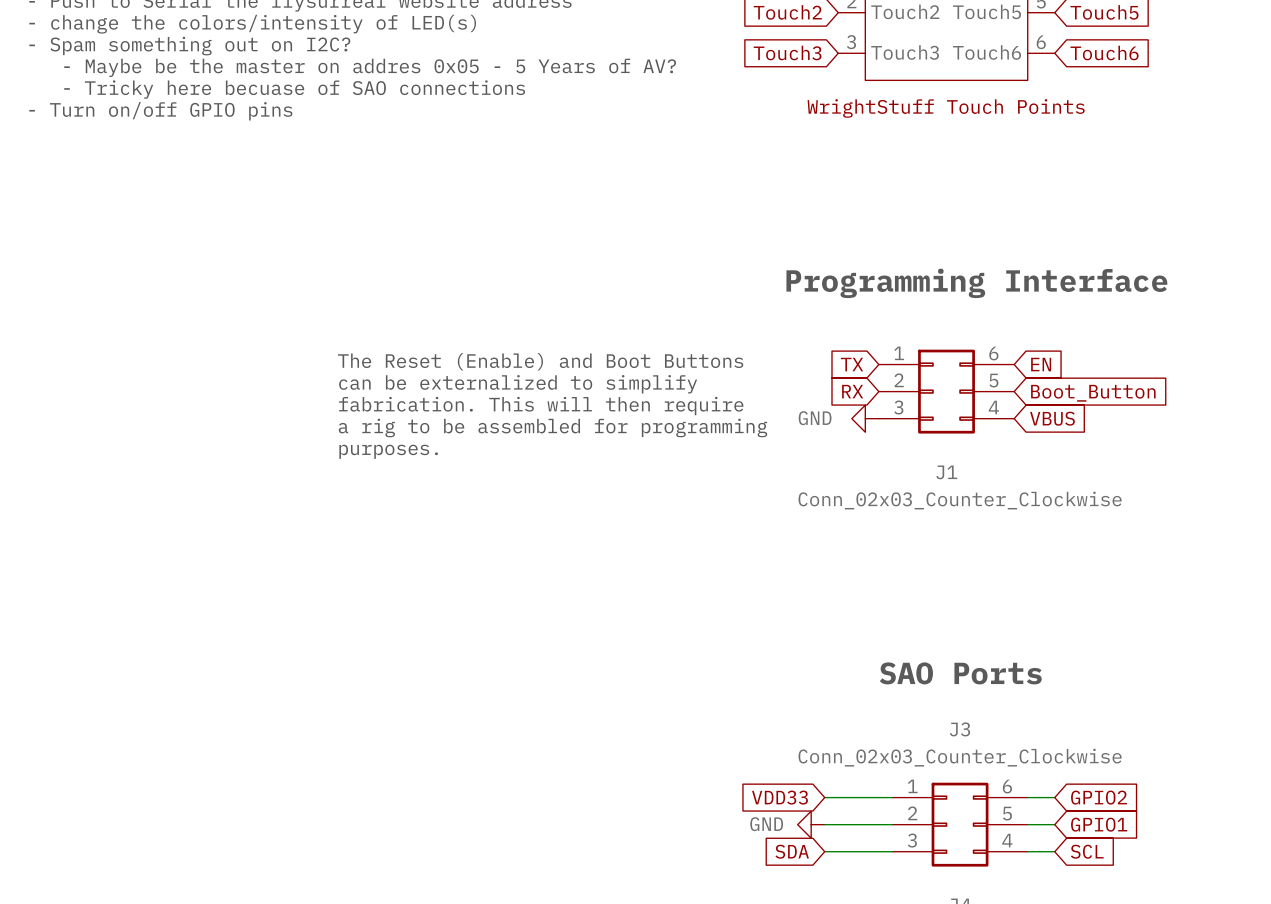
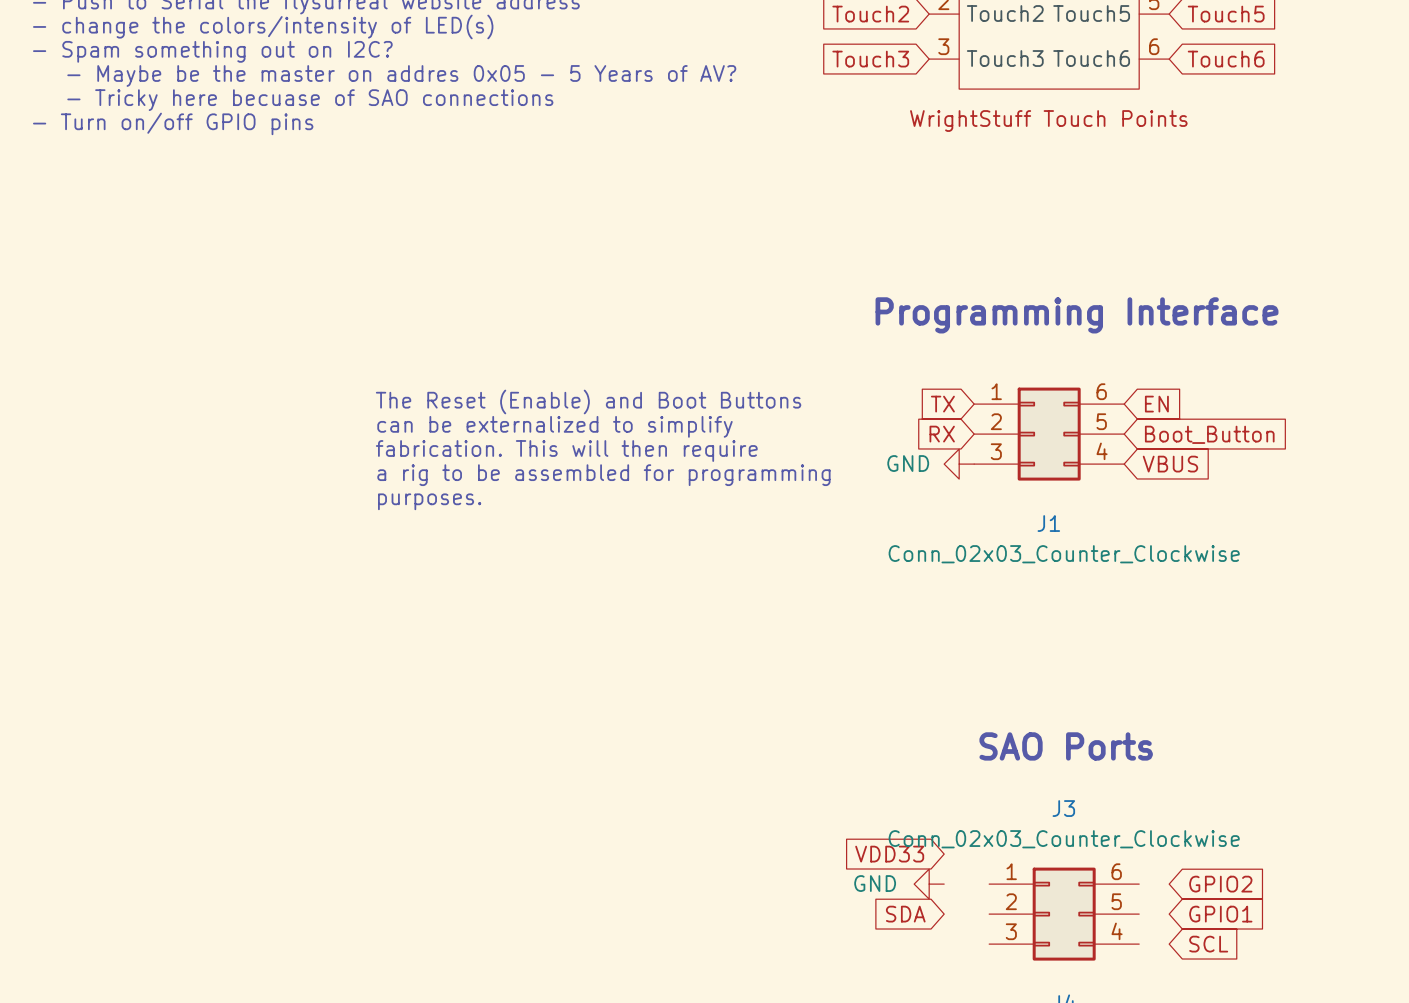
global label position: VDD33 (779, 797) -> VDD33 (889, 854)
wire: (824, 797) (892, 797) -> none
wire: (1027, 797) (1054, 797) -> none
power symbol position: GND (811, 824) -> GND (929, 884)
wire: (824, 824) (892, 824) -> none
wire: (1027, 824) (1054, 824) -> none
global label position: SDA (792, 851) -> SDA (905, 914)
wire: (824, 851) (892, 851) -> none
wire: (1027, 851) (1054, 851) -> none

